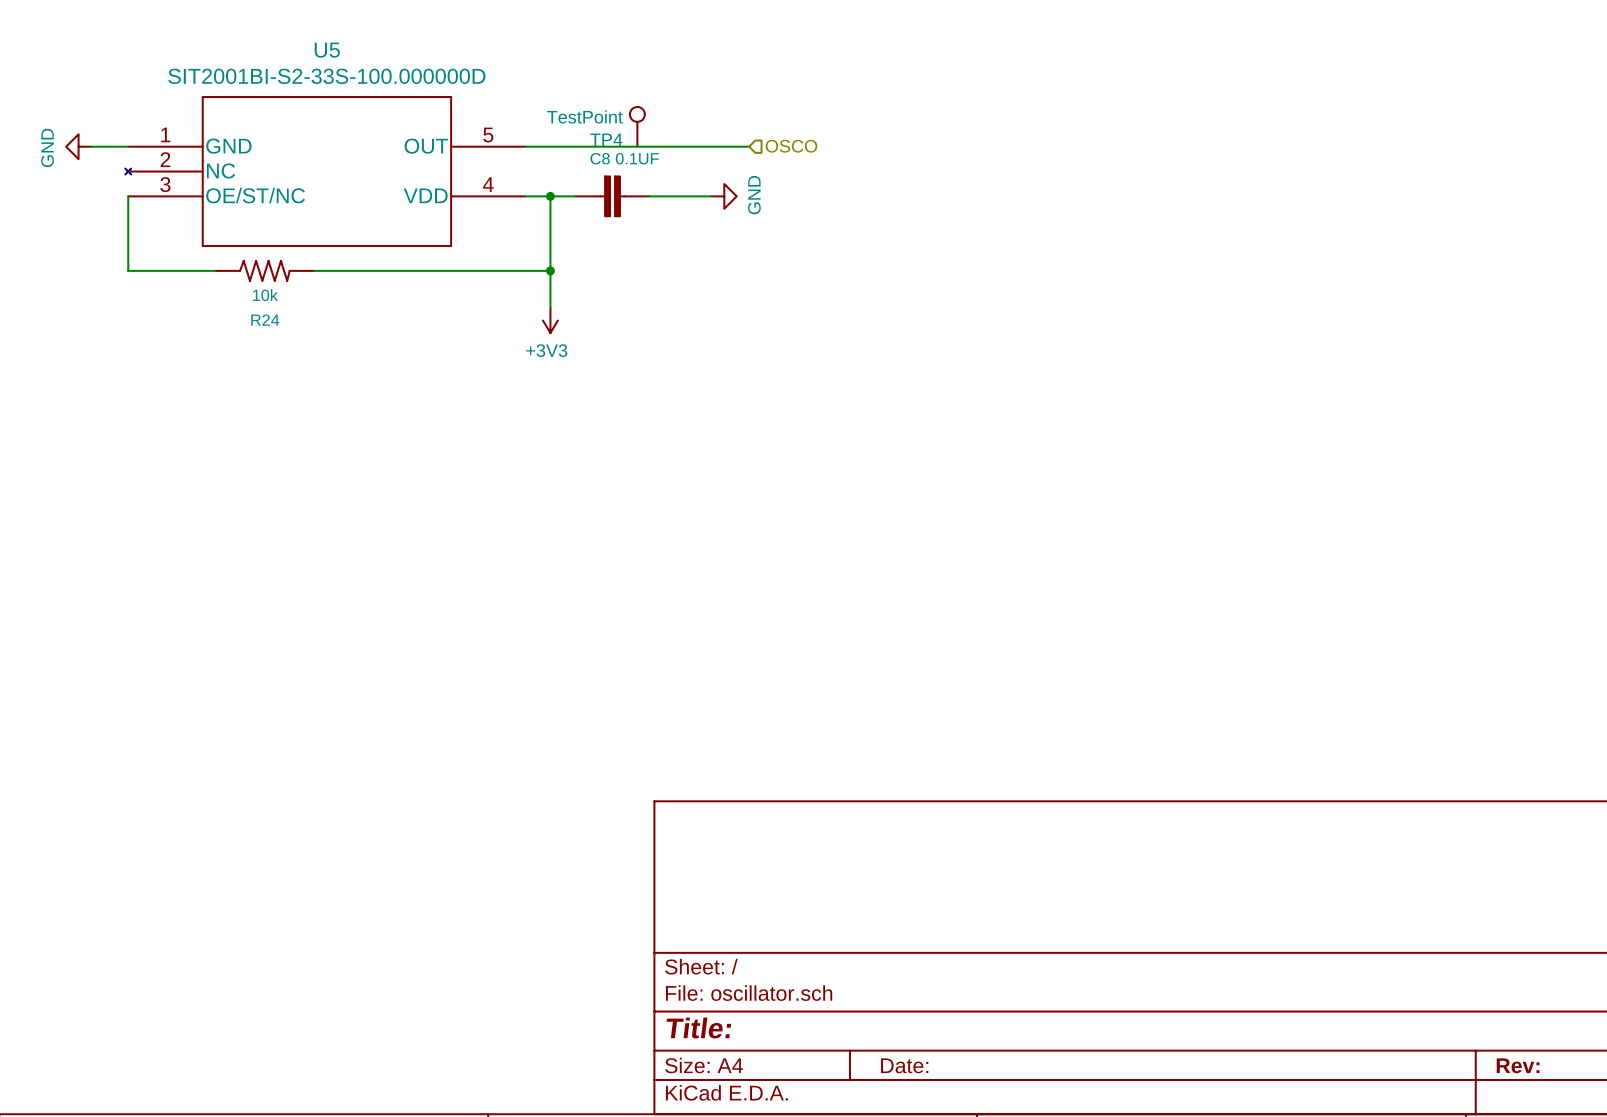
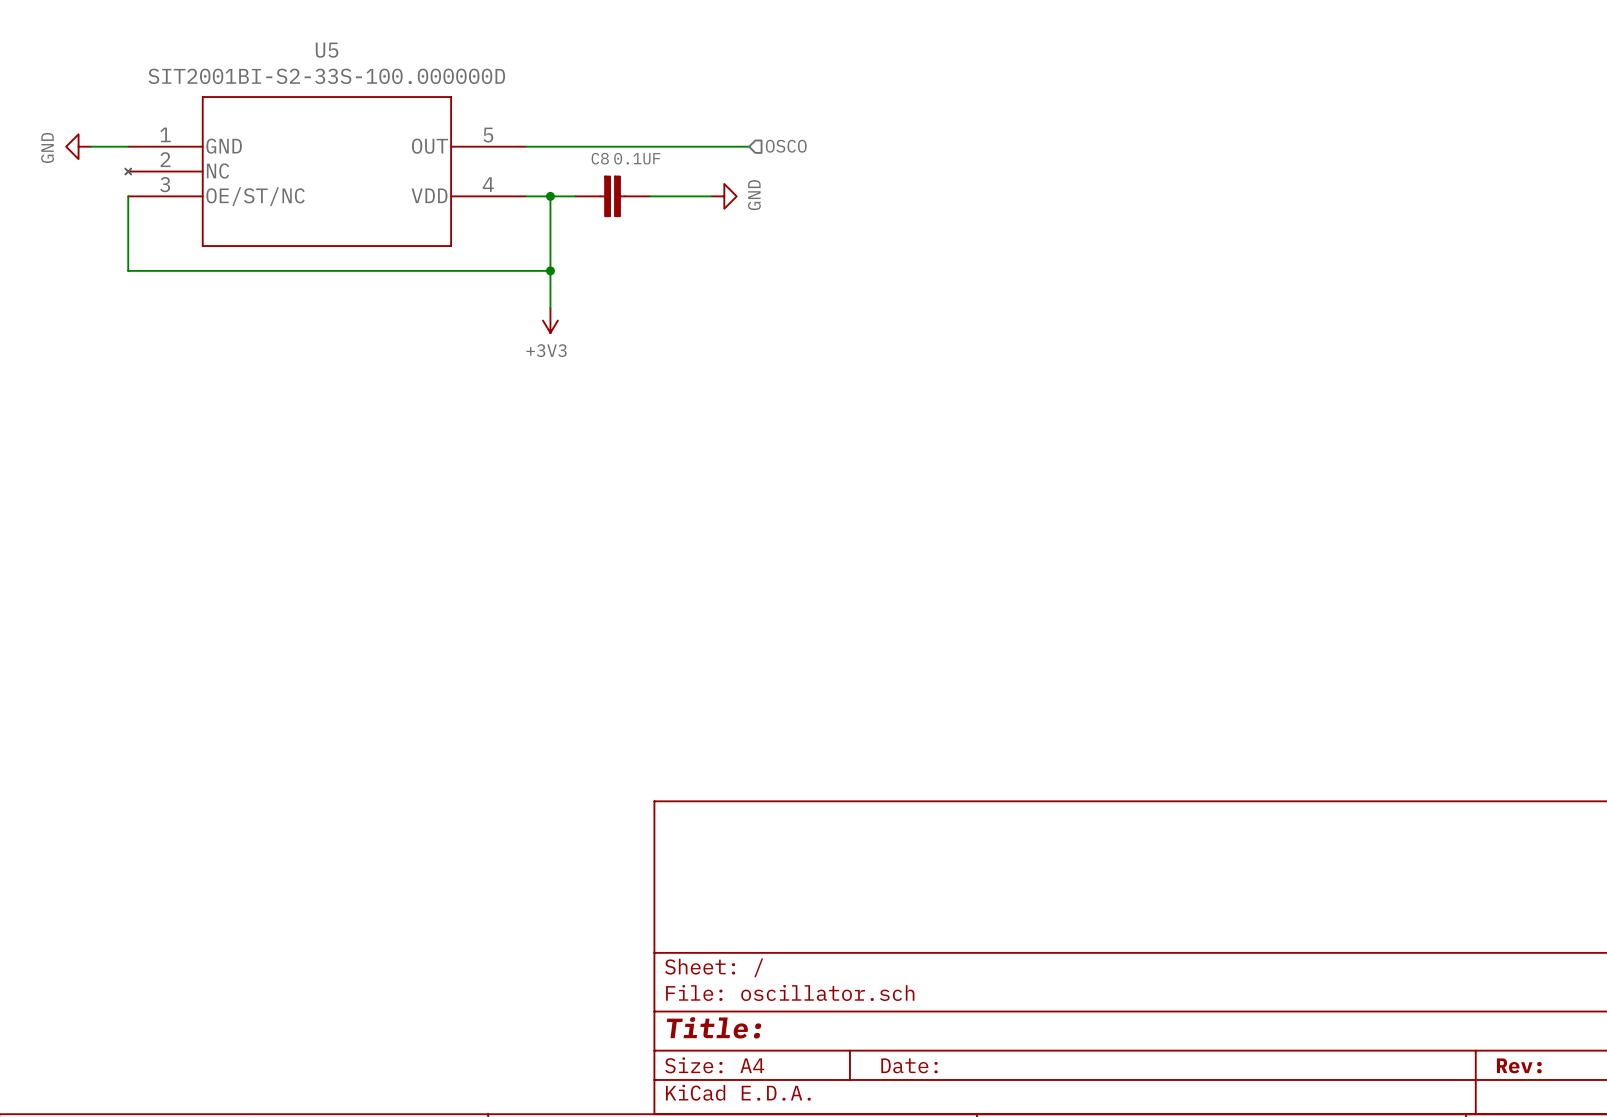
TP4: TestPoint (637, 126) -> none
R24: 10k (264, 270) -> none

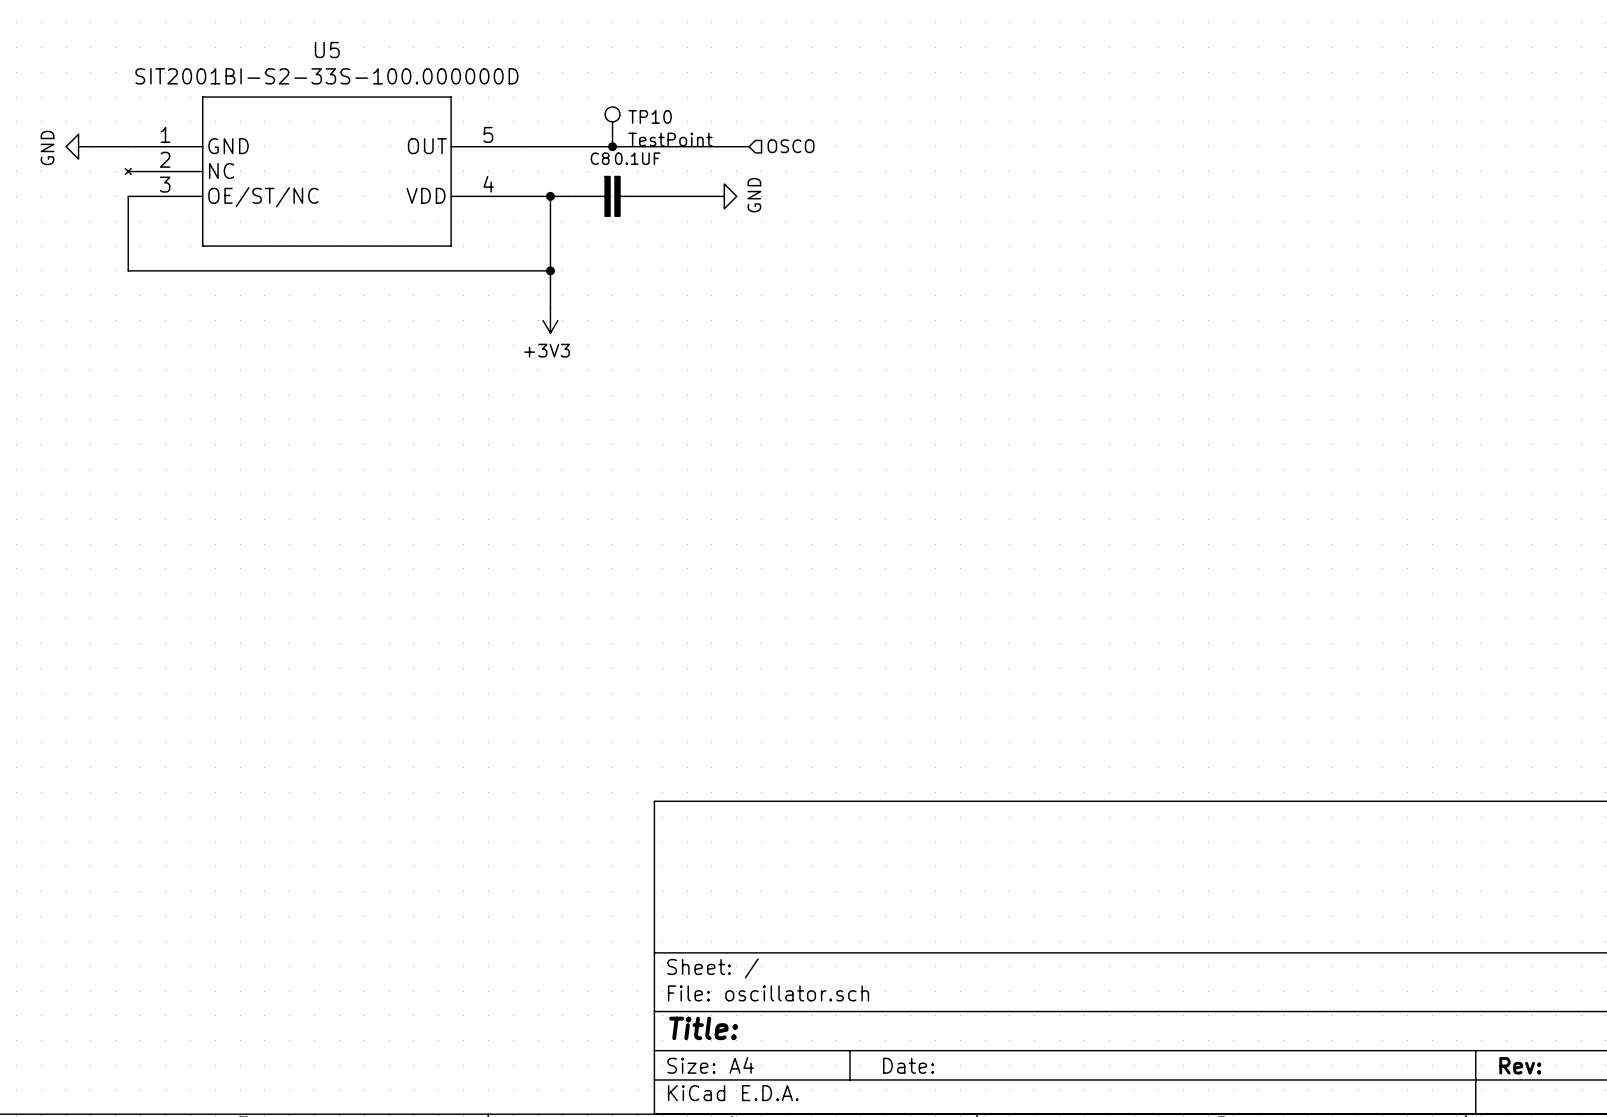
TP10: none -> TestPoint (612, 126)
junction: none -> (612, 146)

